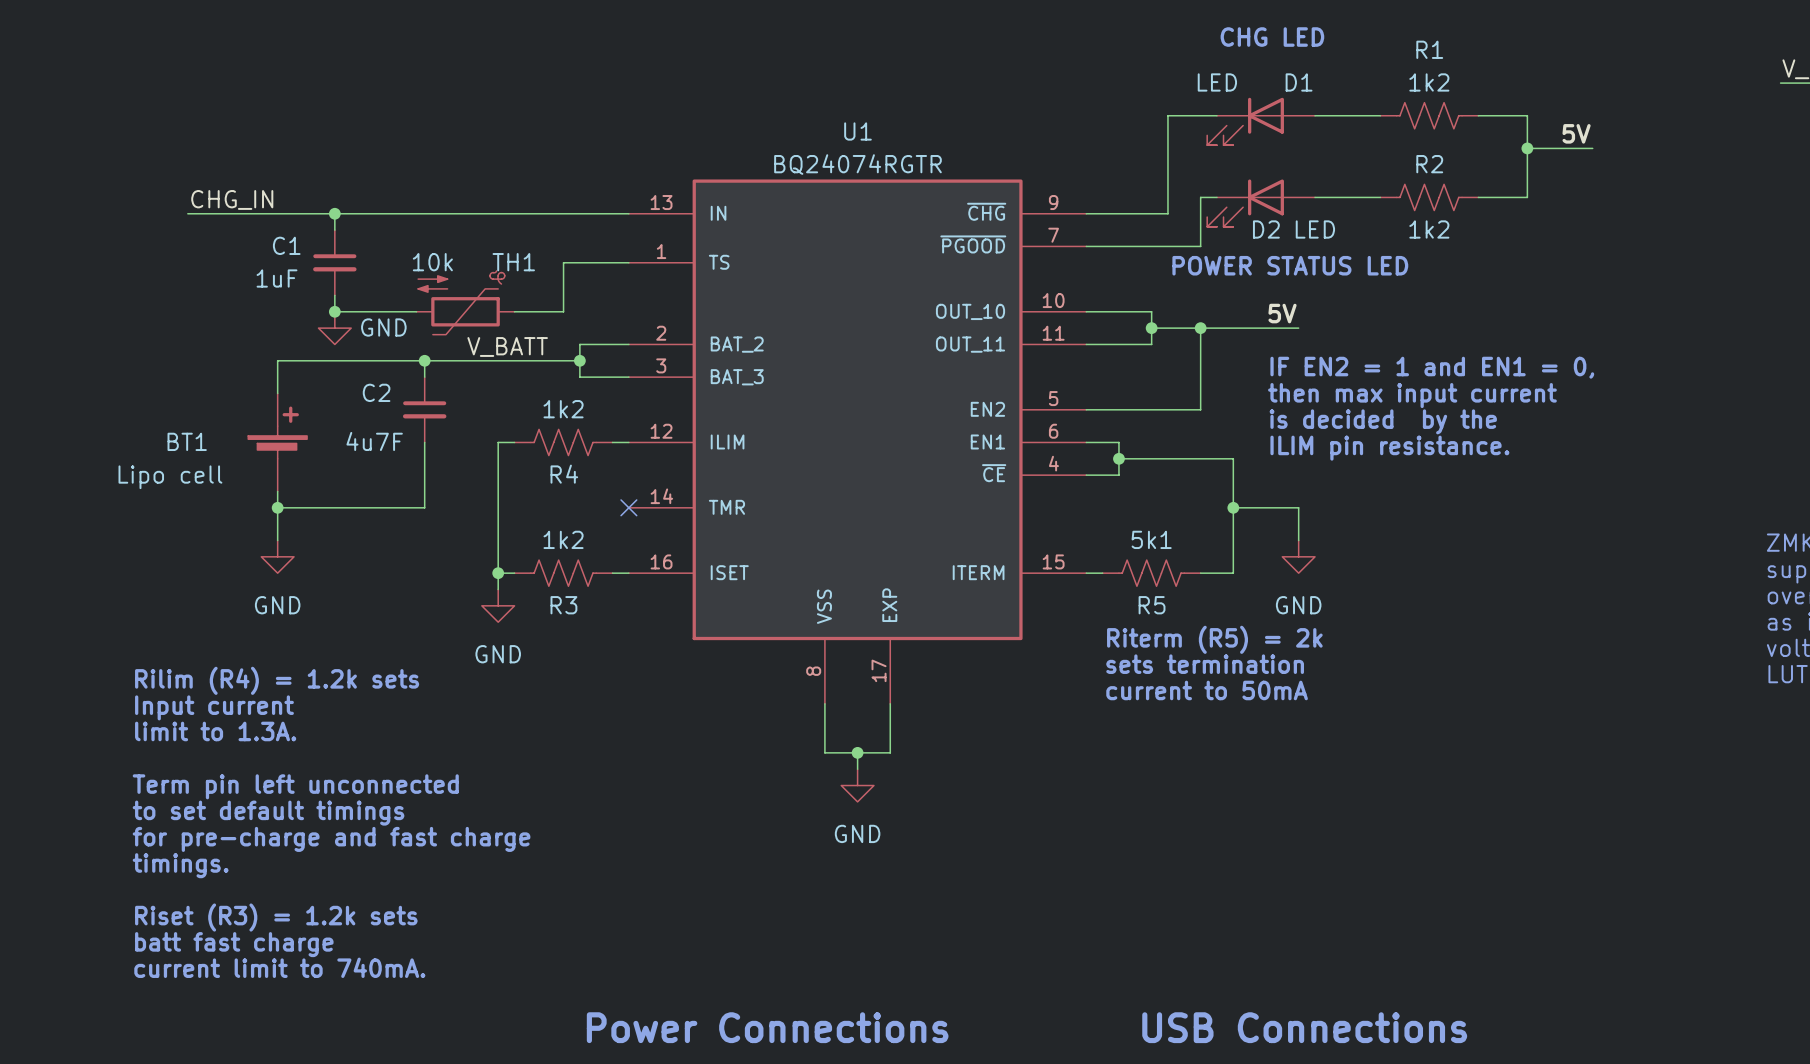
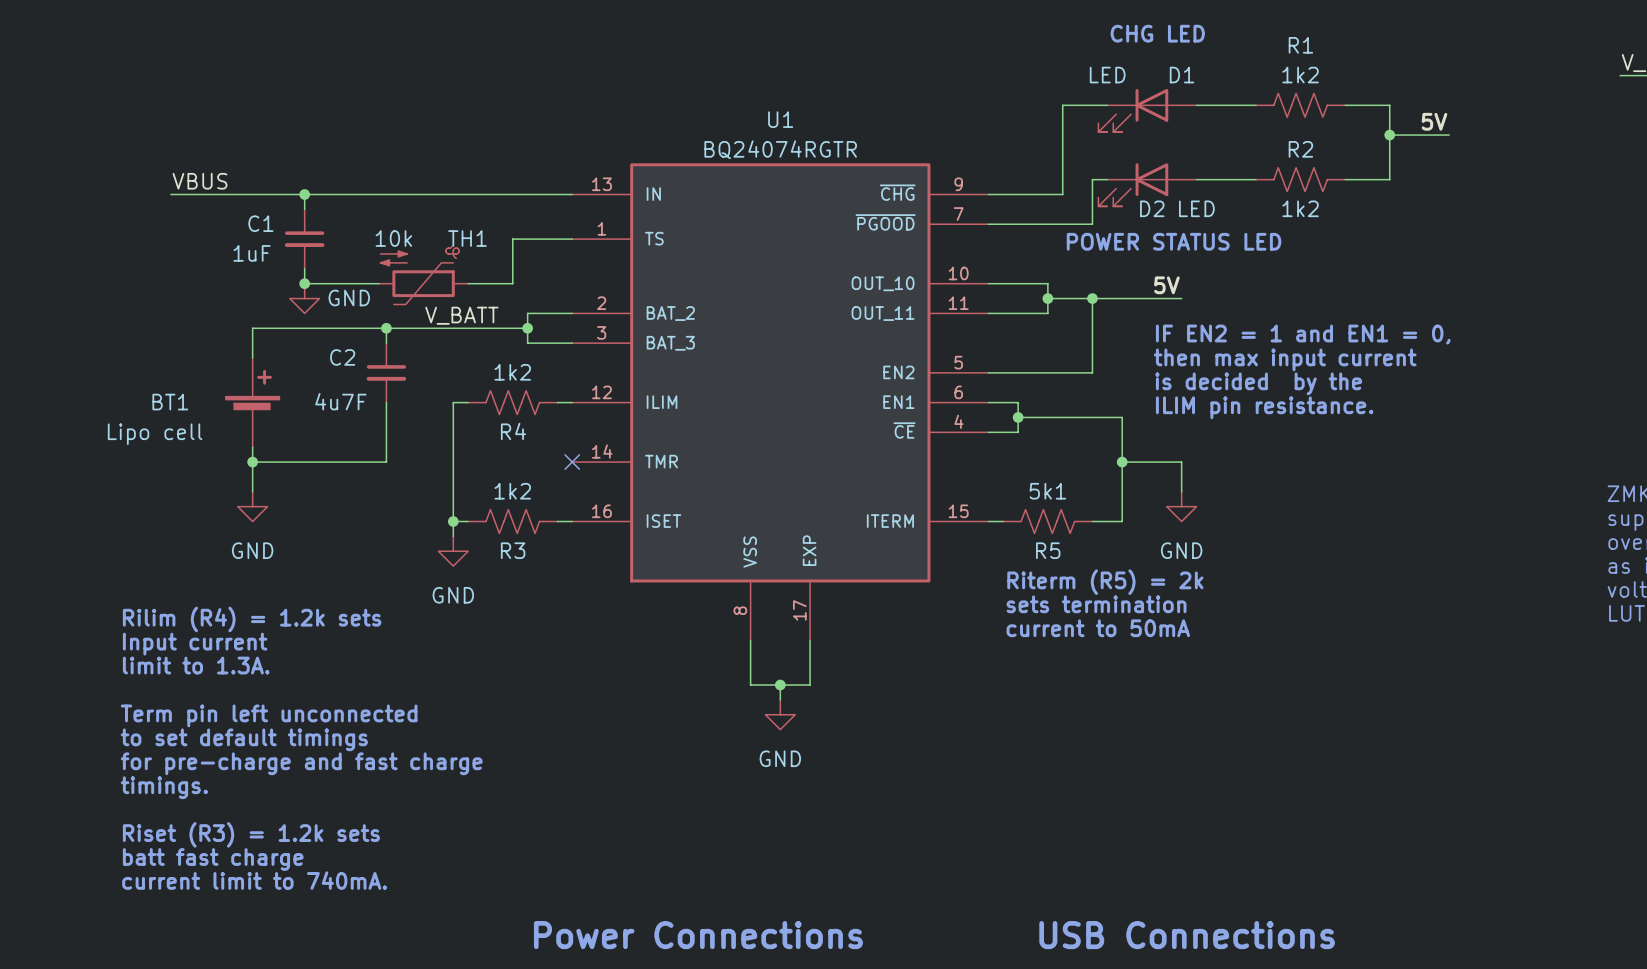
label: CHG_IN (232, 199) -> VBUS (200, 181)

